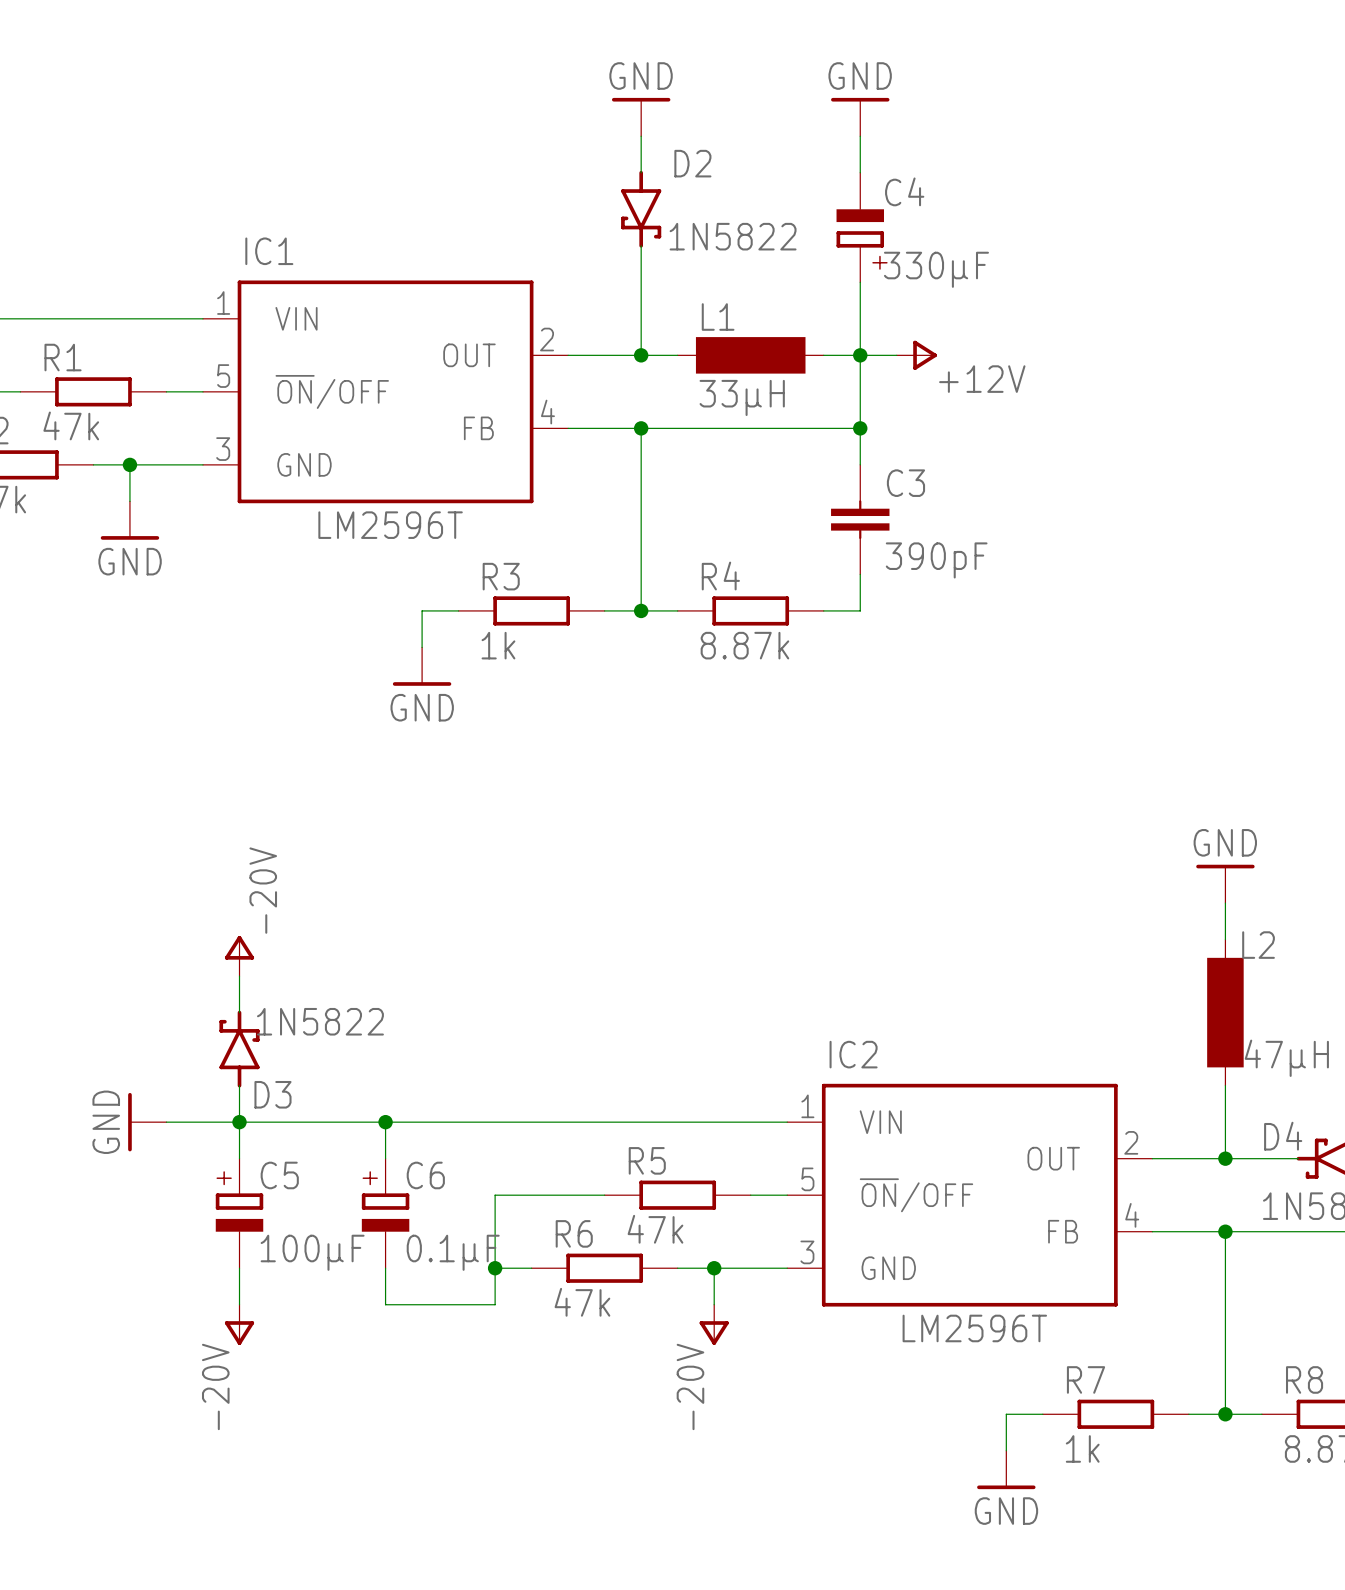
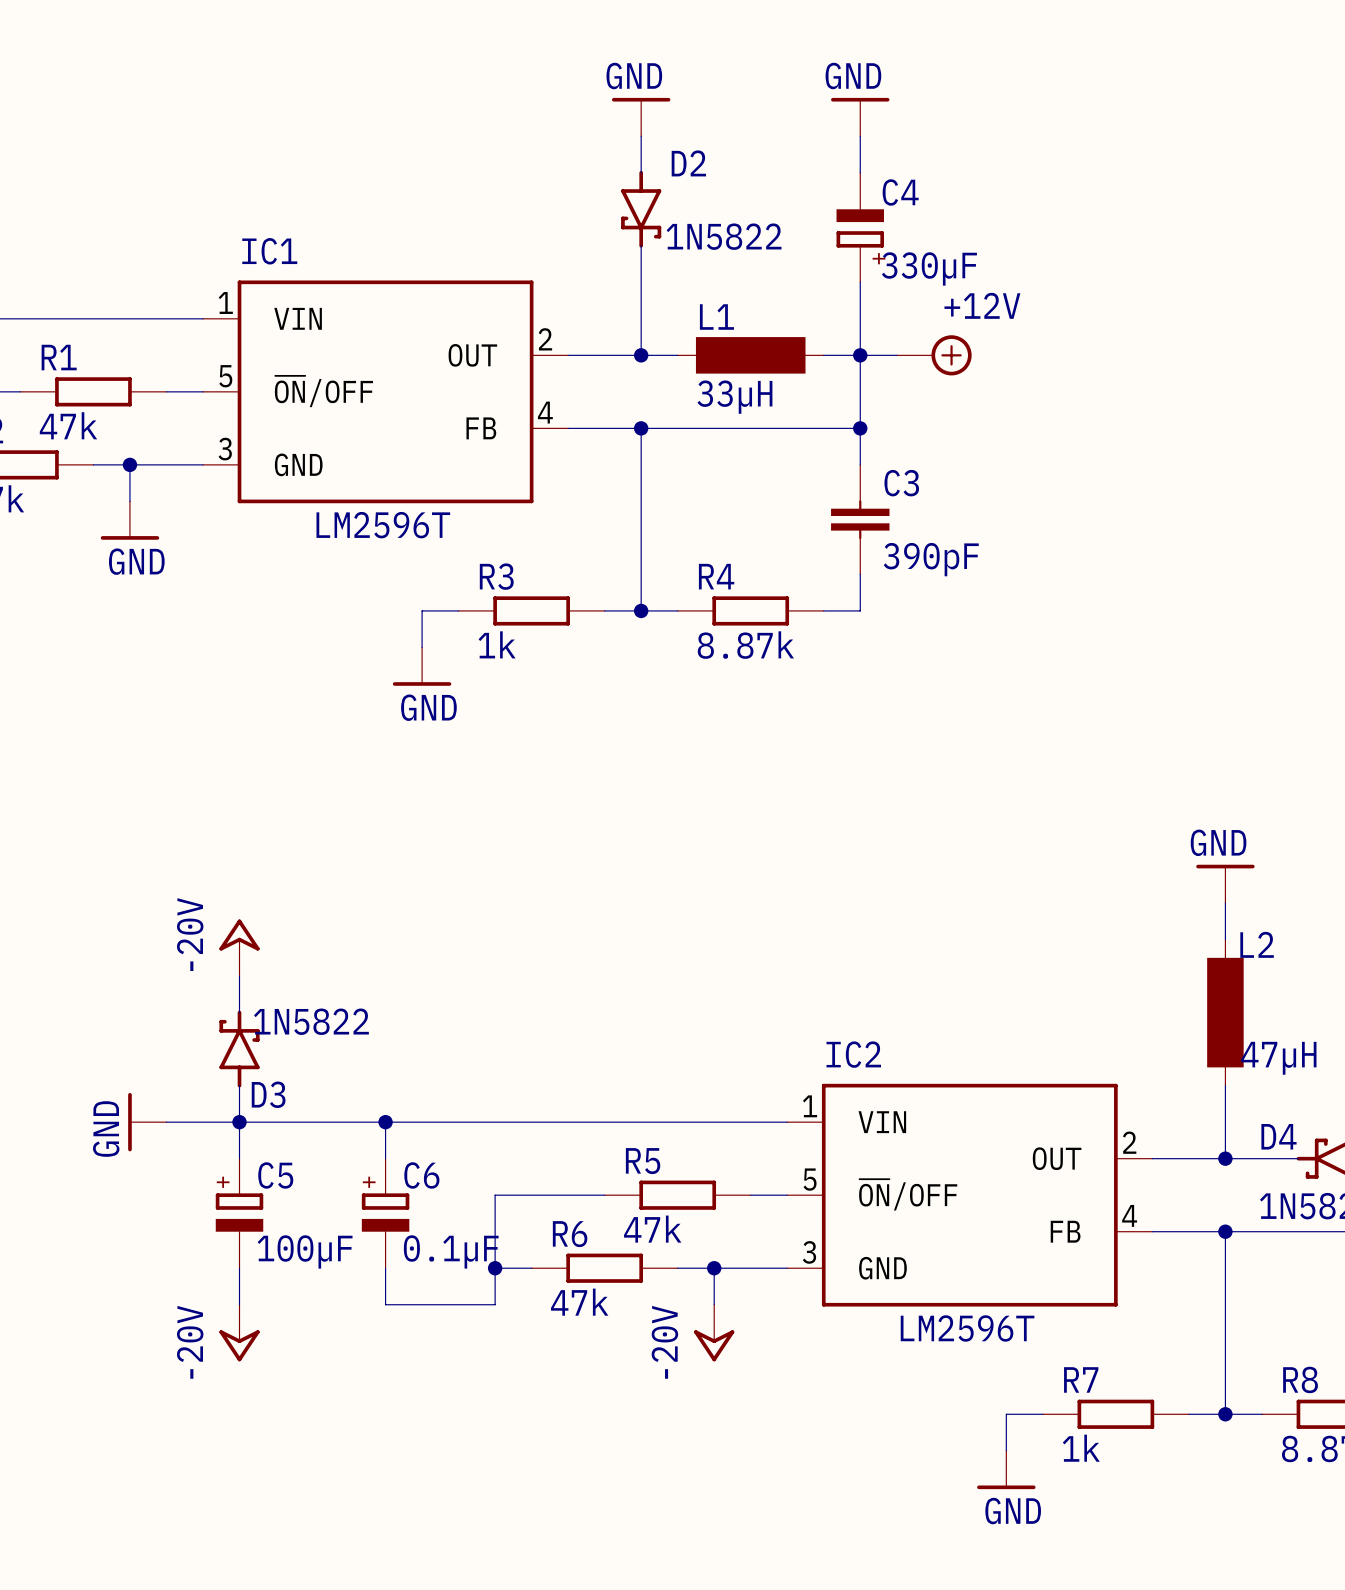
power symbol: +12V (916, 355) -> none
power symbol: none -> +12V (934, 355)
power symbol text position: -20V (263, 890) -> -20V (190, 934)
power symbol shape: [224, 935, 255, 977] -> [219, 919, 260, 977]
power symbol shape: [224, 1304, 255, 1345] -> [219, 1304, 260, 1362]
power symbol shape: [699, 1304, 729, 1345] -> [694, 1304, 735, 1362]
power symbol text position: -20V (215, 1386) -> -20V (190, 1342)
power symbol text position: -20V (690, 1386) -> -20V (664, 1342)

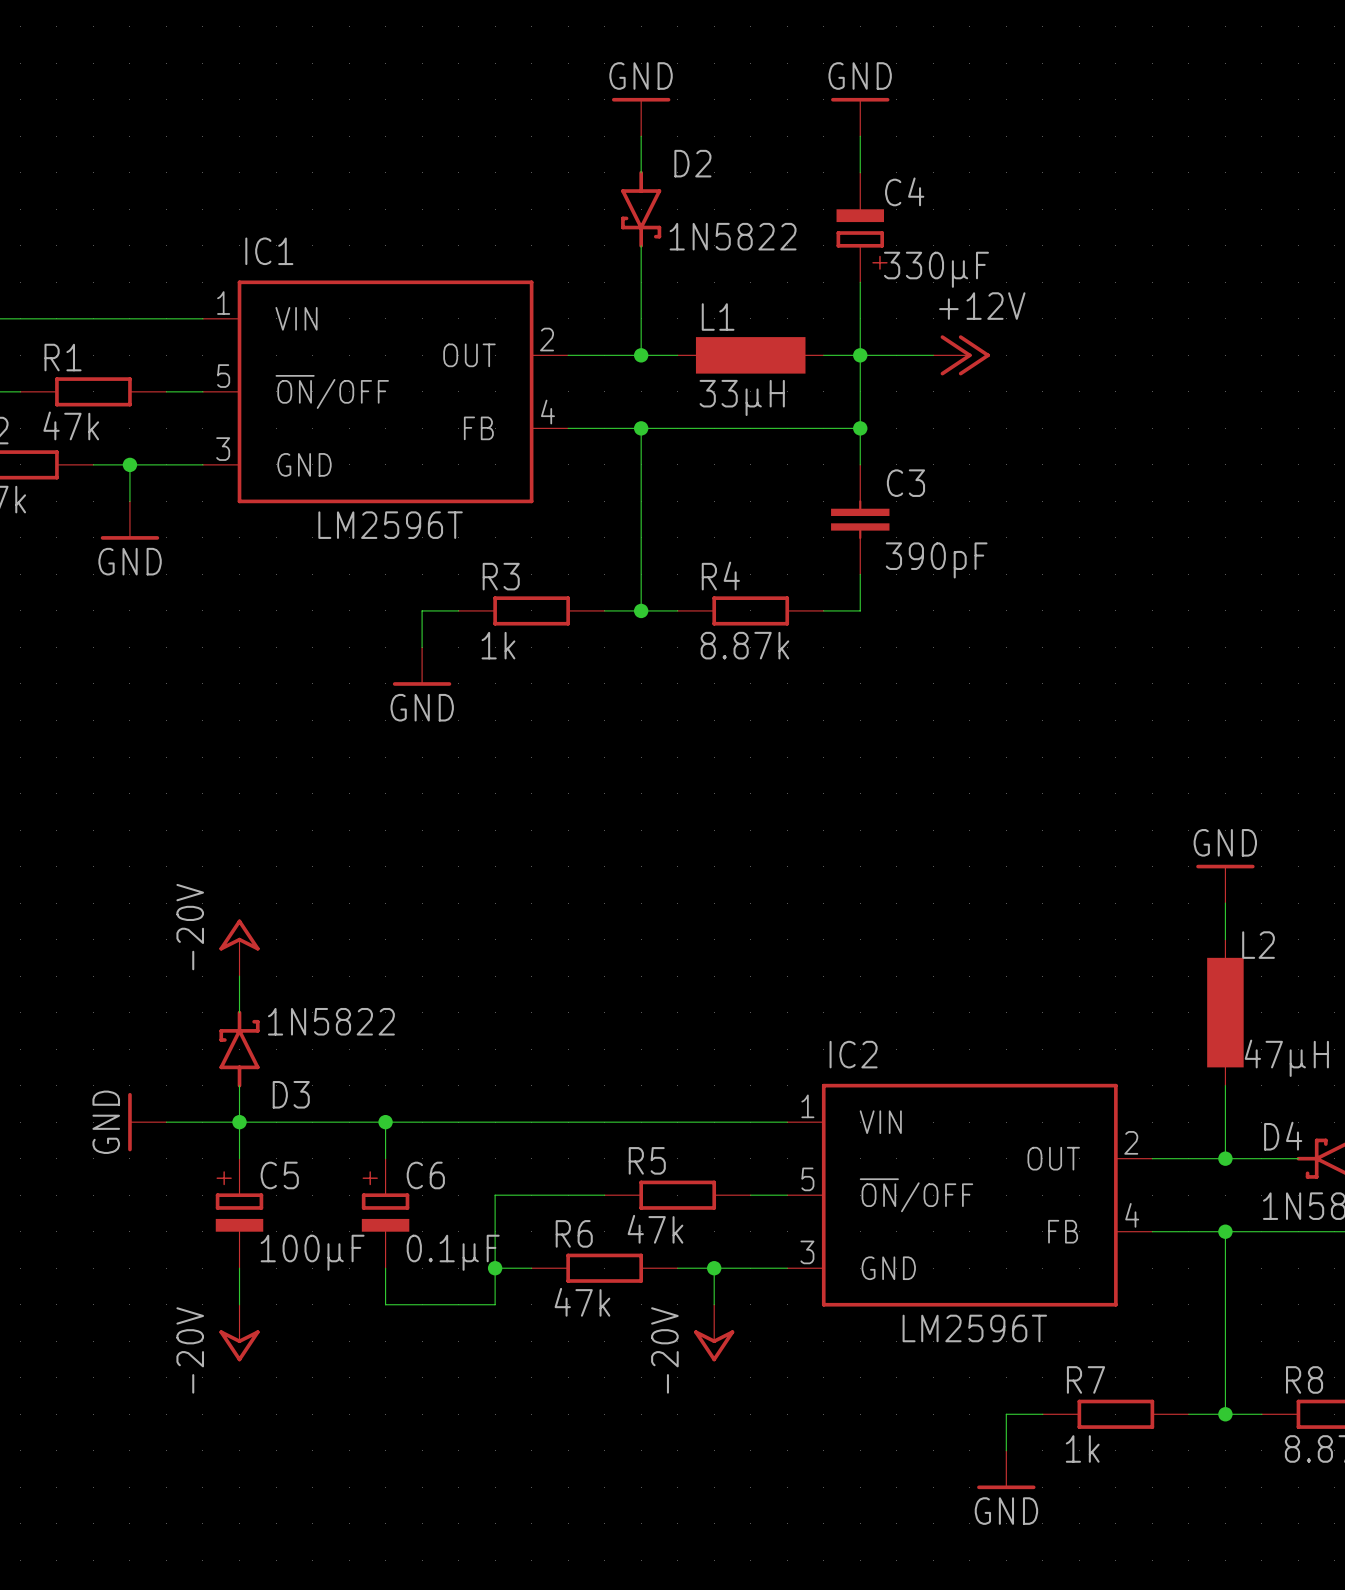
power symbol: +12V (934, 355) -> none
power symbol: none -> +12V (961, 355)
D3 flip: as is (239, 1049) -> left-right (239, 1049)

